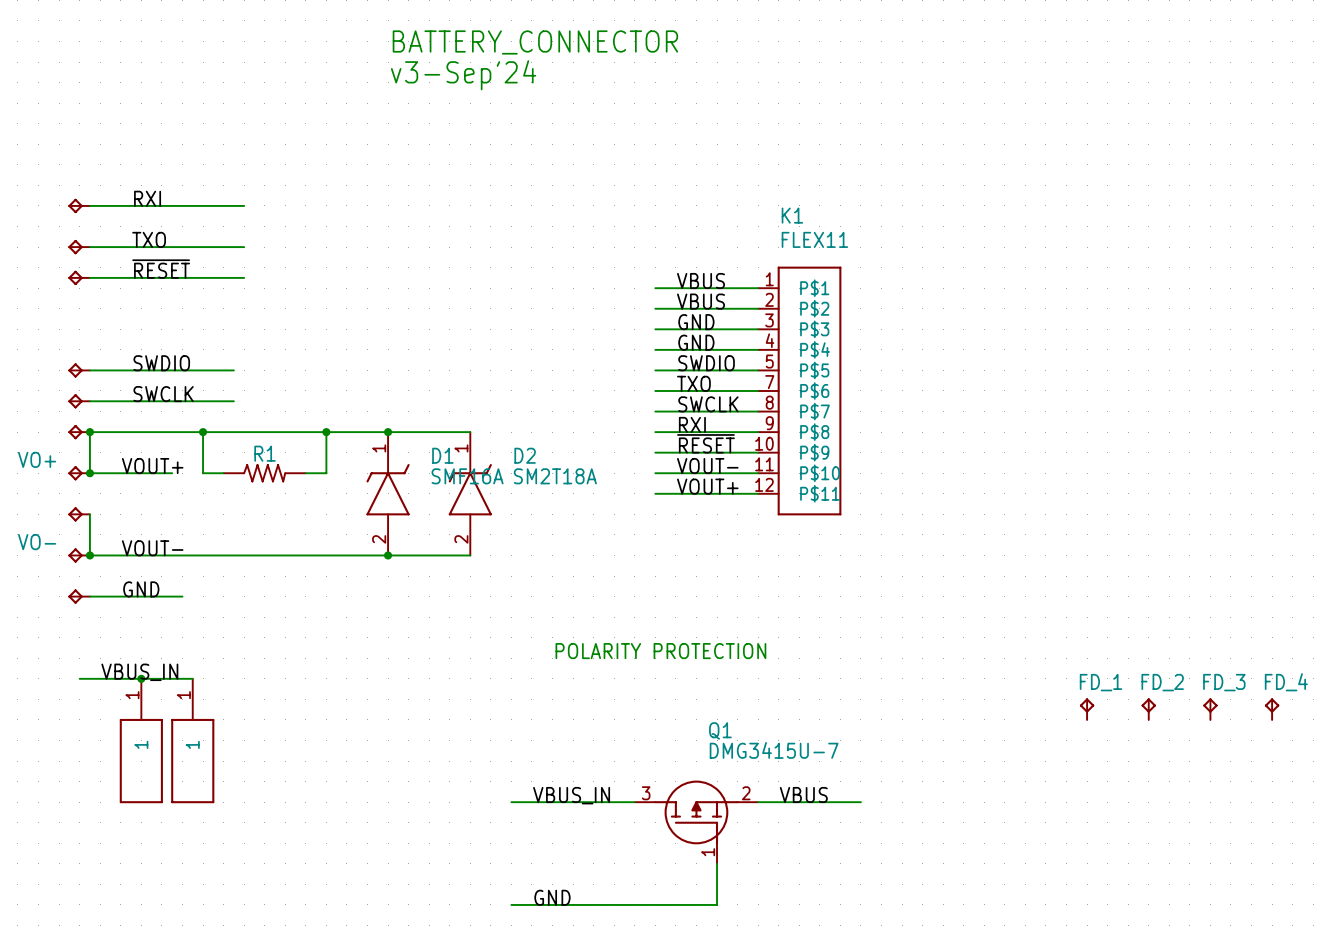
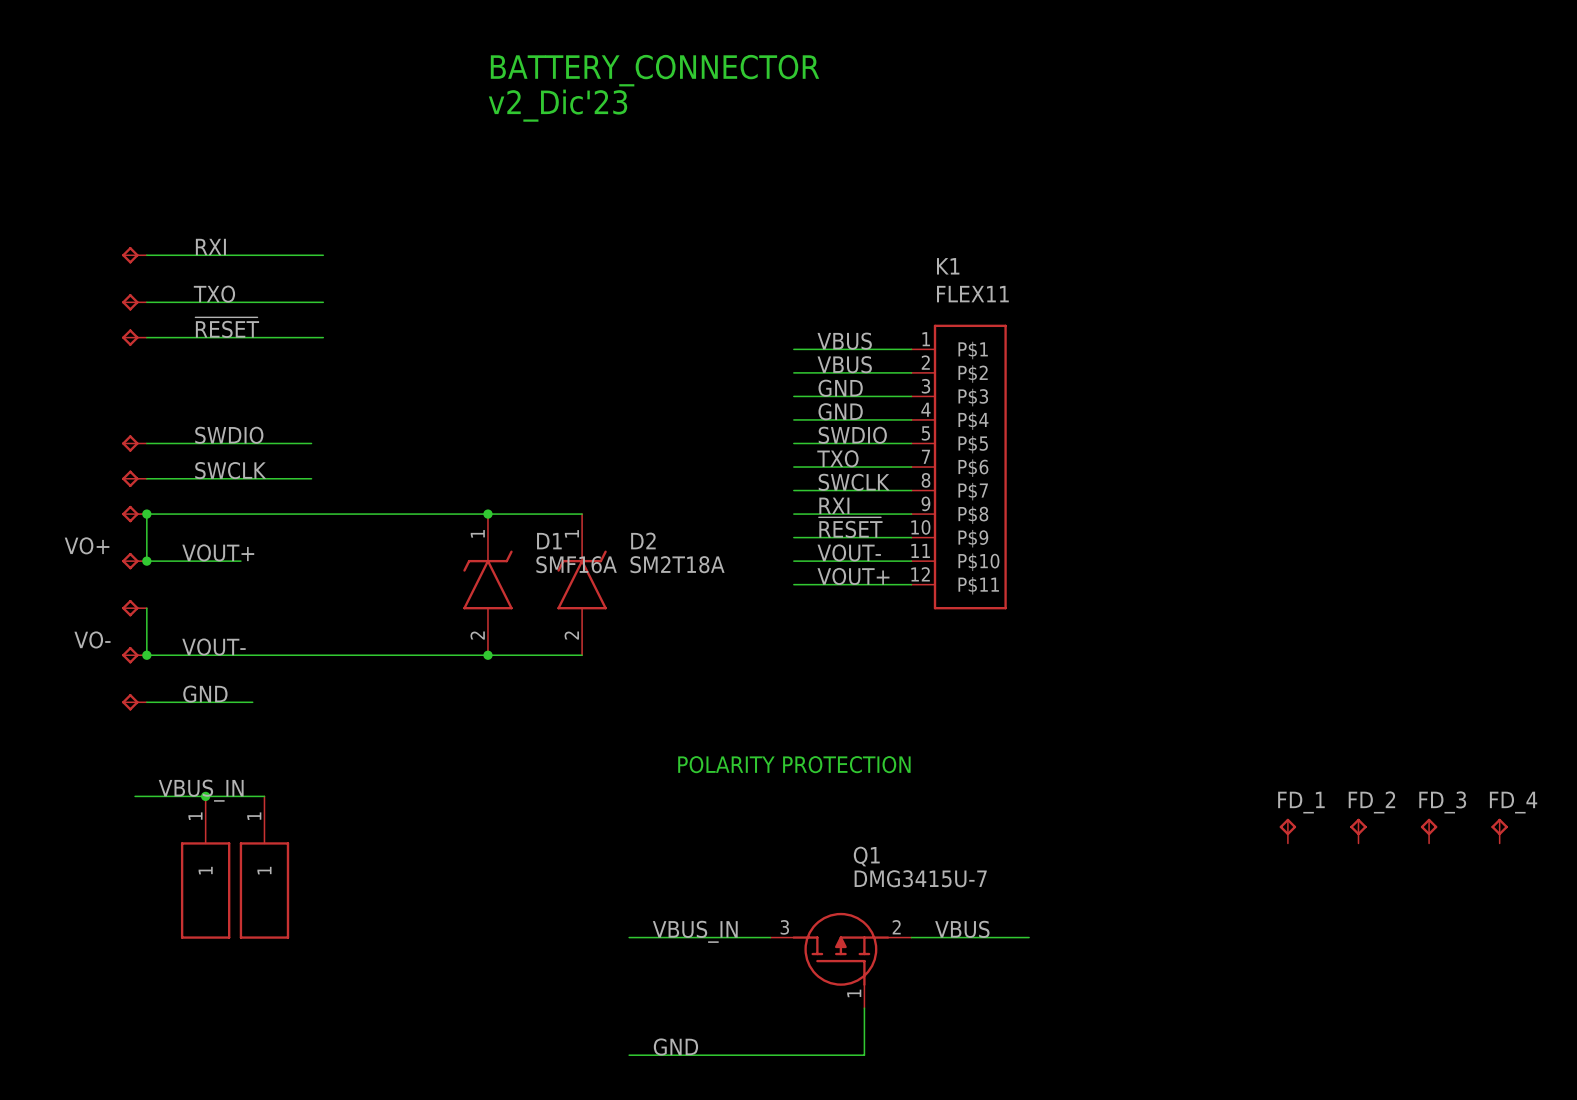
text: v3-Sep'24 (463, 75) -> v2_Dic'23 (558, 105)
wire: (203, 432) (203, 473) (223, 473) -> none
junction: (203, 432) -> none
wire: (326, 432) (326, 473) (305, 473) -> none
junction: (326, 432) -> none
R1: (264, 473) -> none

